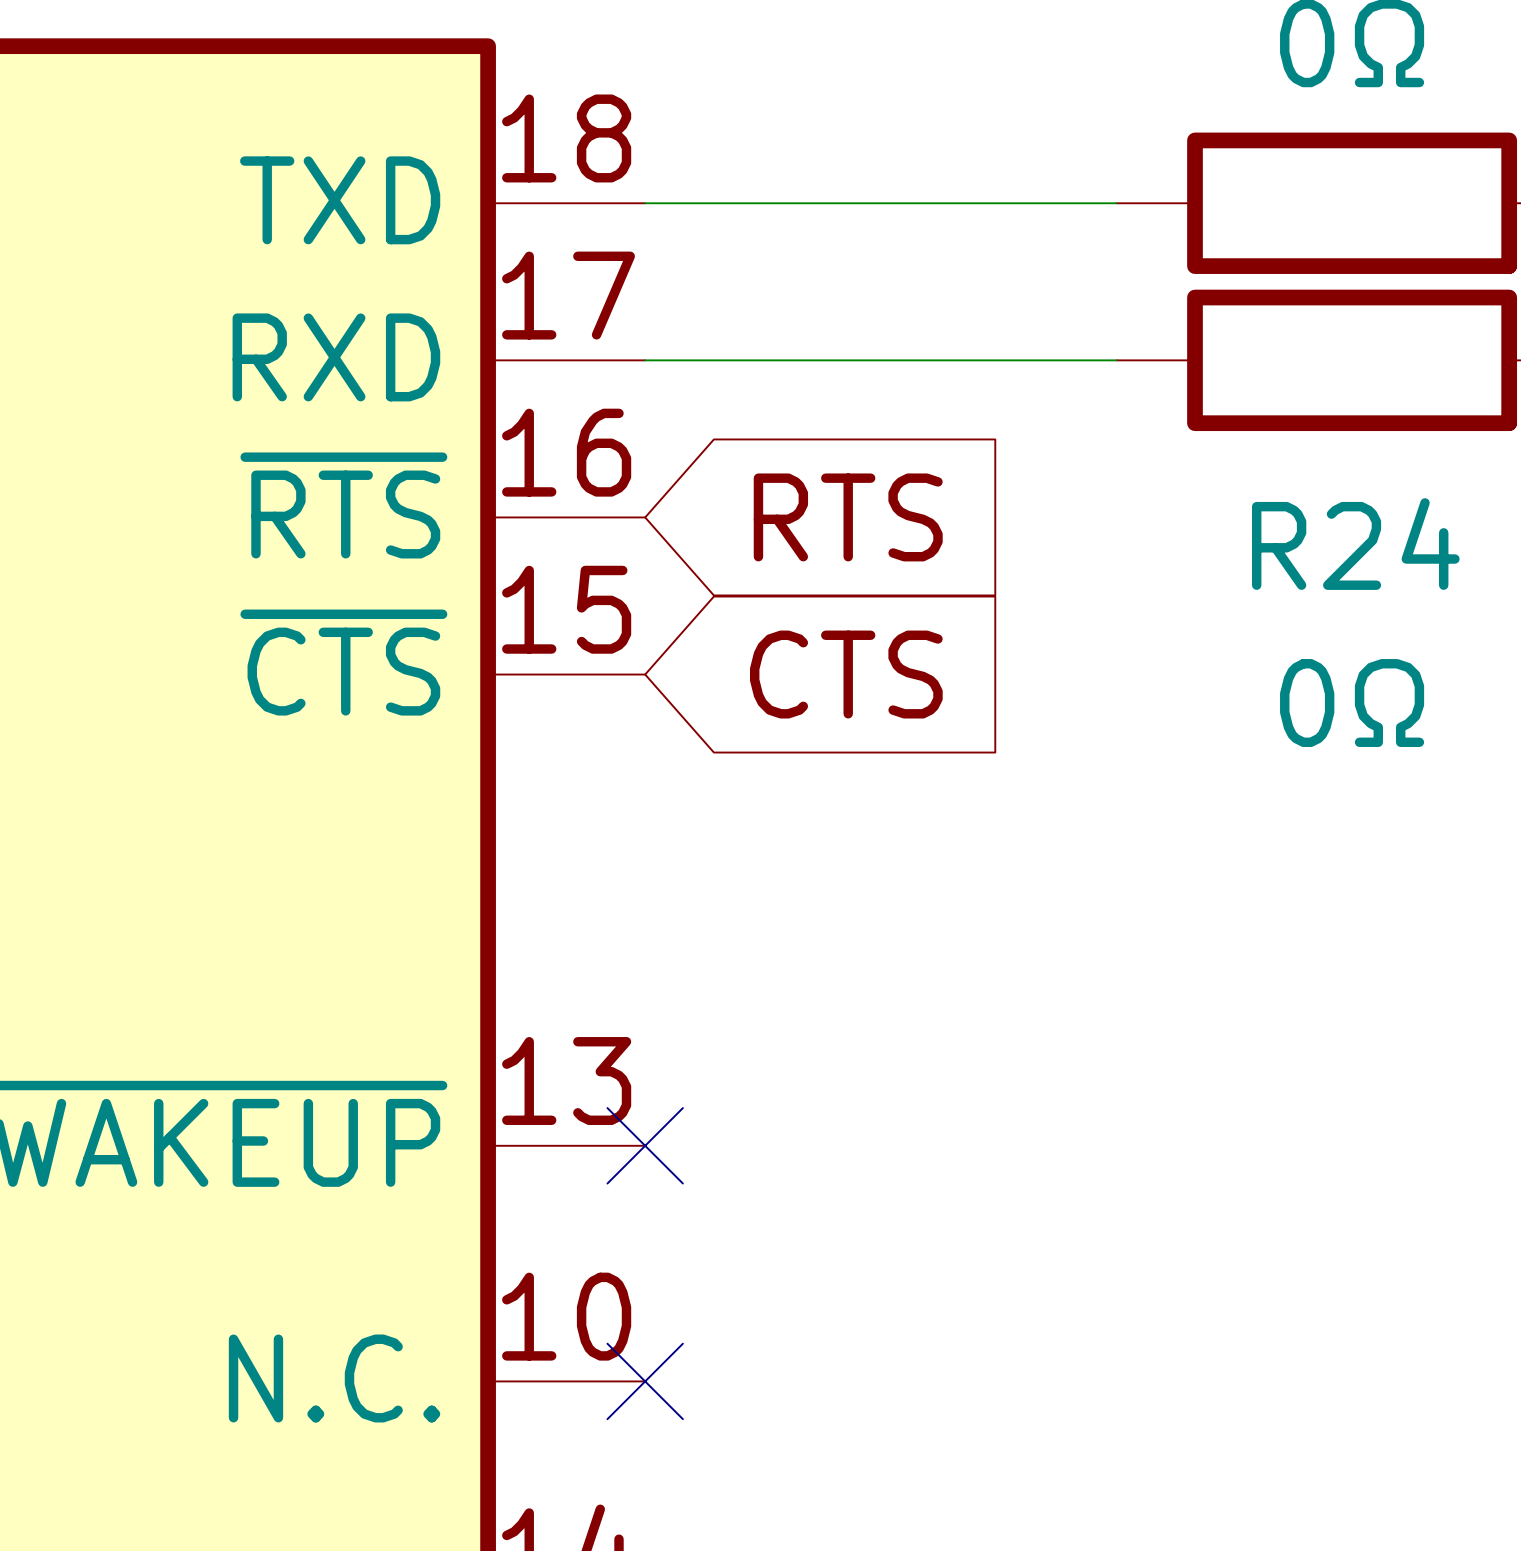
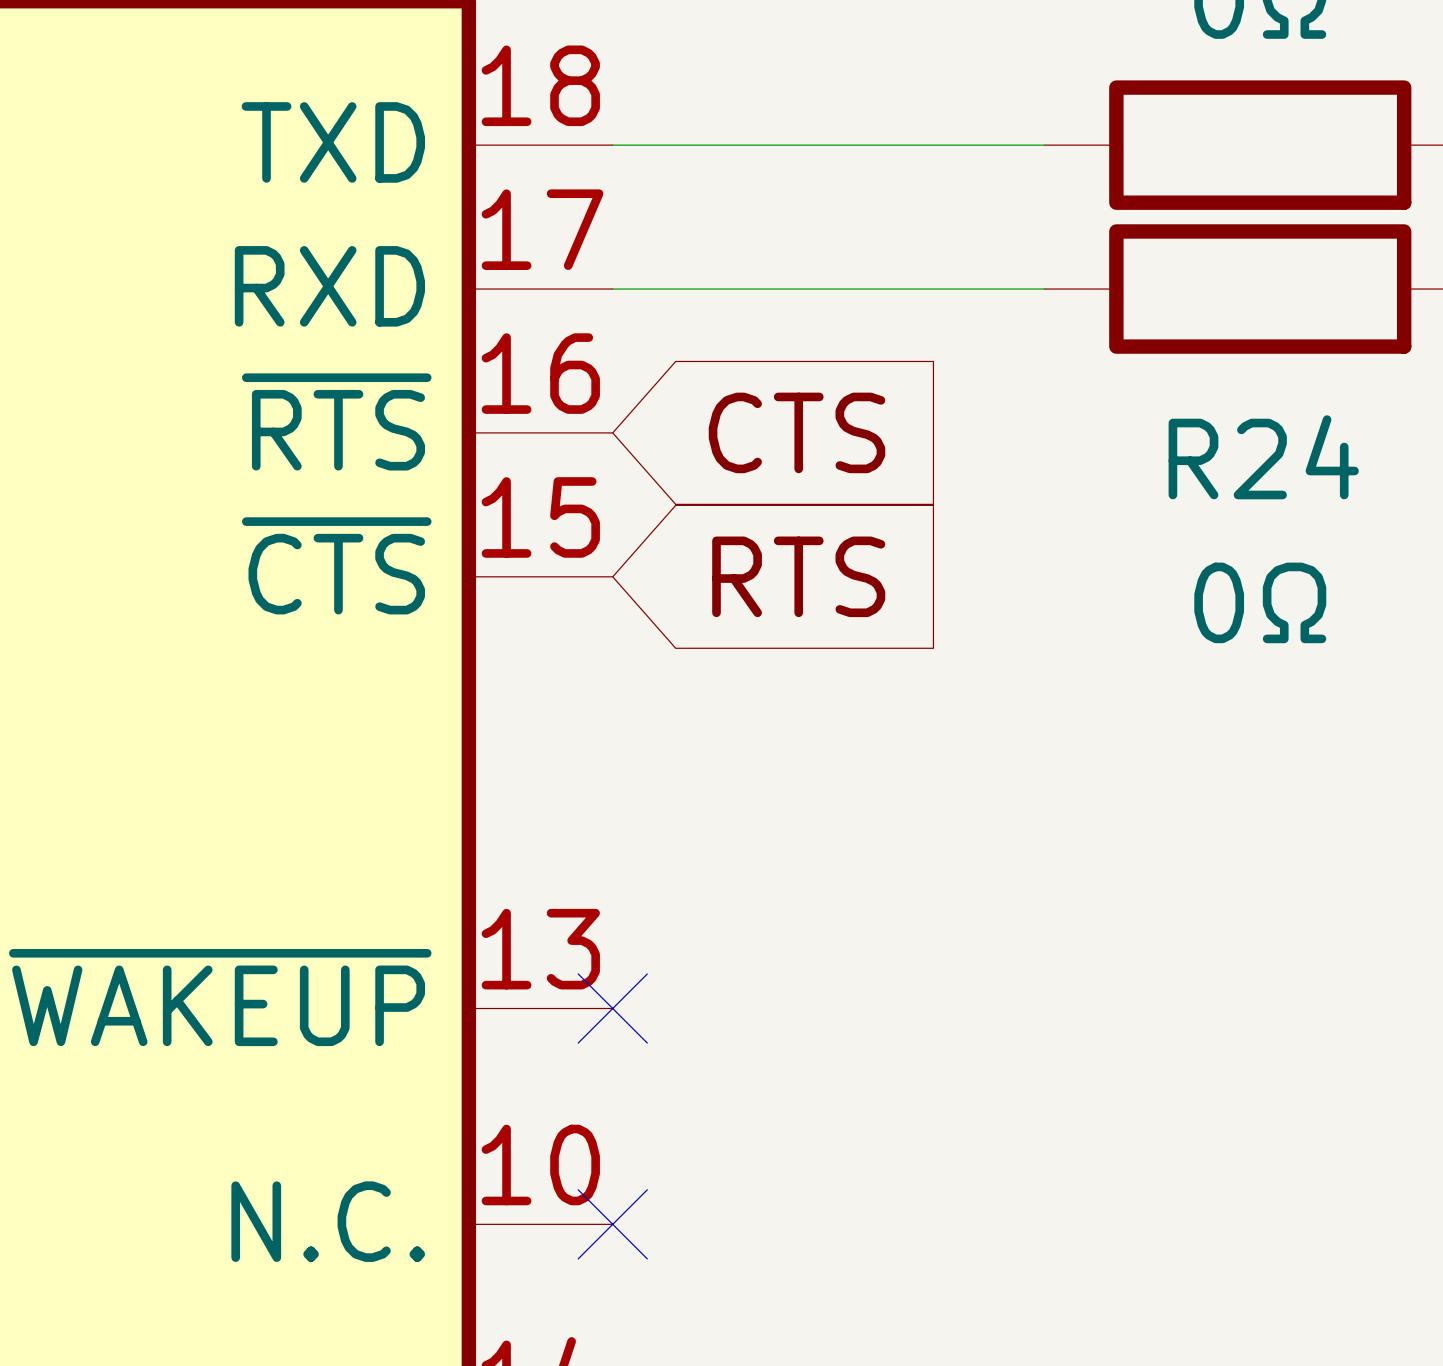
global label: RTS (848, 517) -> CTS (797, 432)
global label: CTS (846, 674) -> RTS (798, 576)

